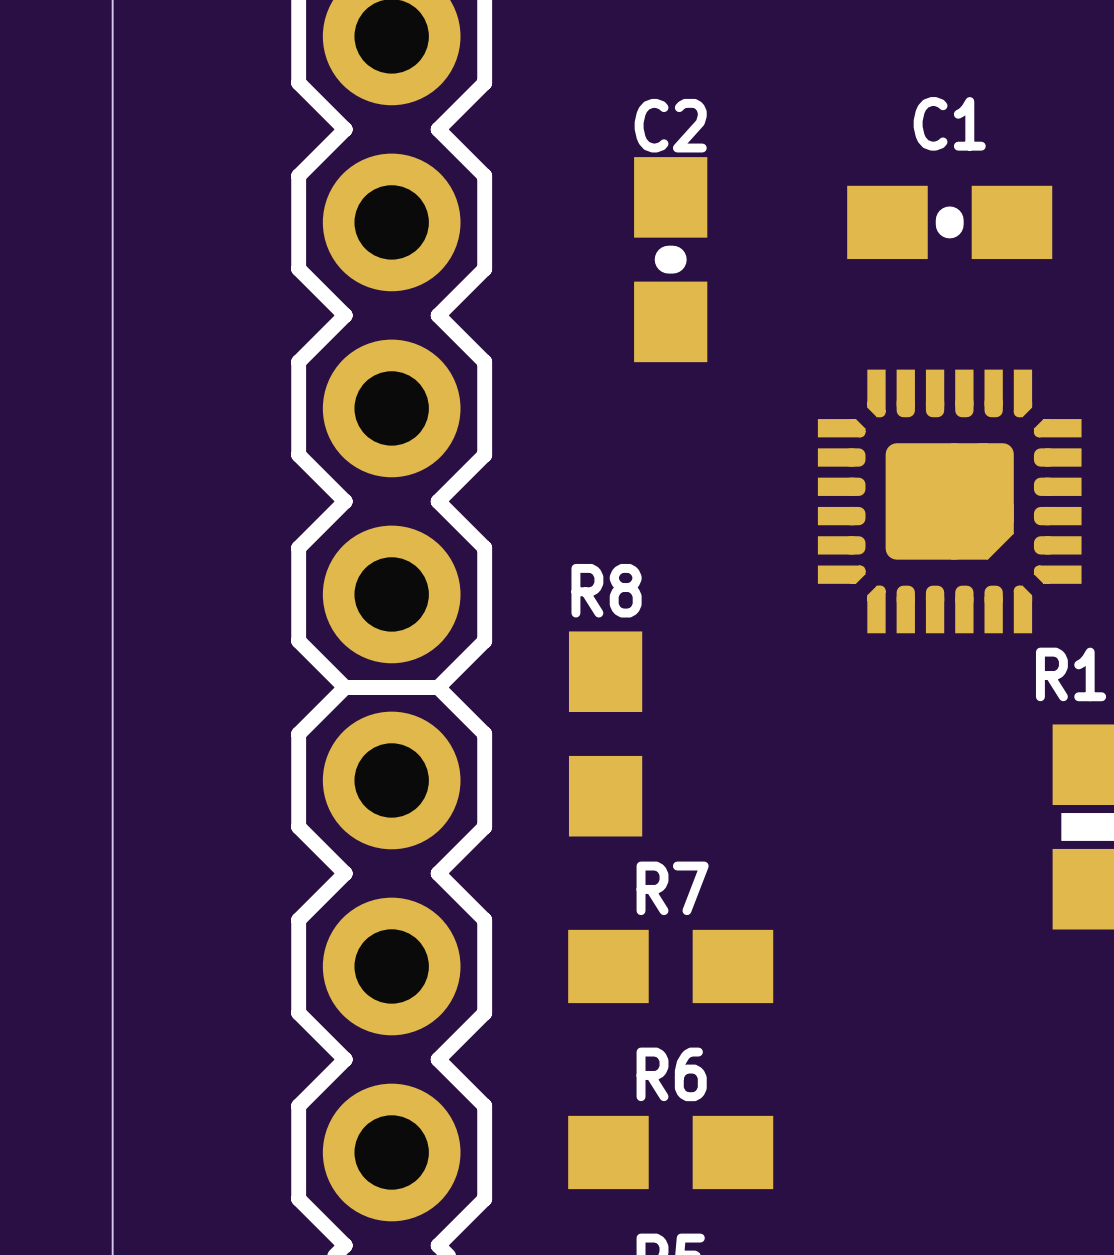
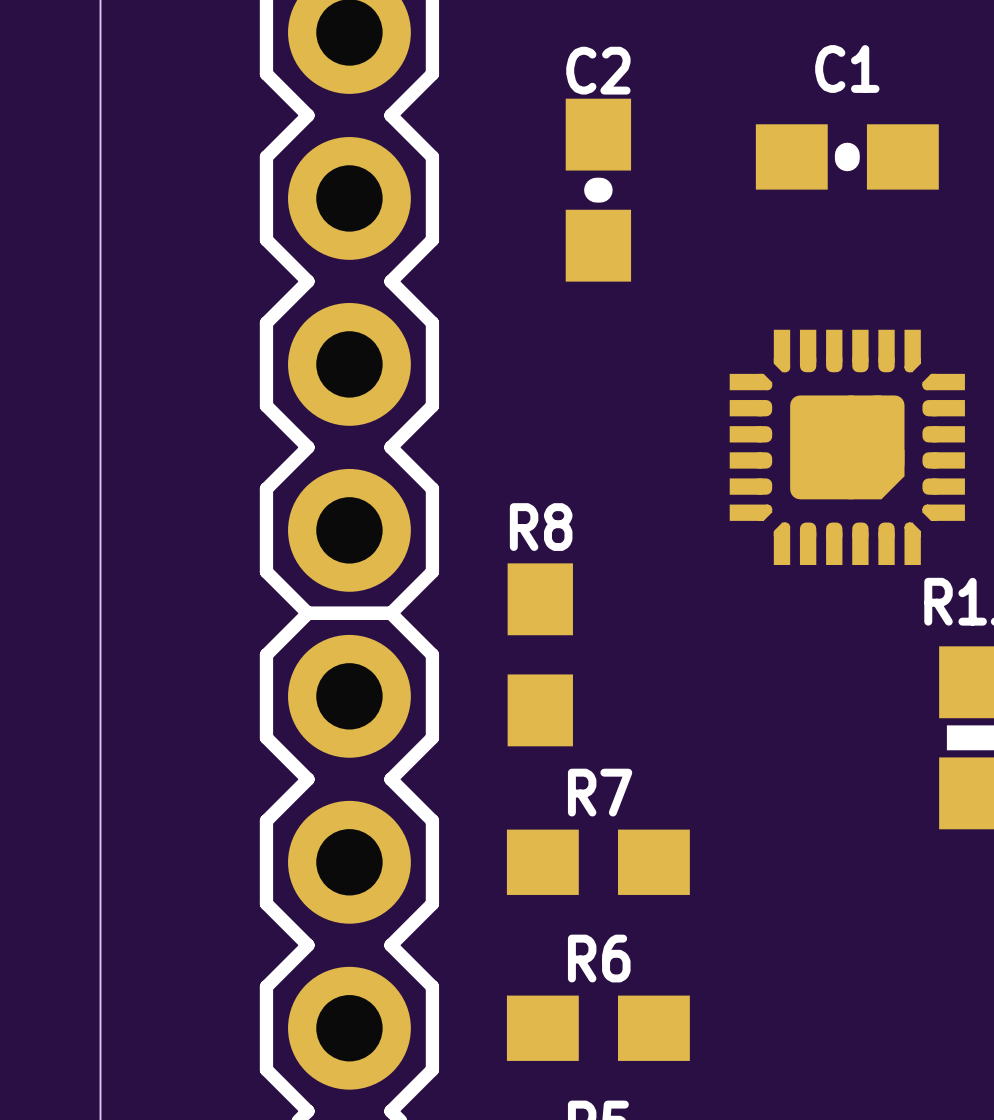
text position: C2 (670, 125) -> C2 (598, 70)
C1 position: (949, 222) -> (847, 156)
part position: (670, 259) -> (598, 190)

